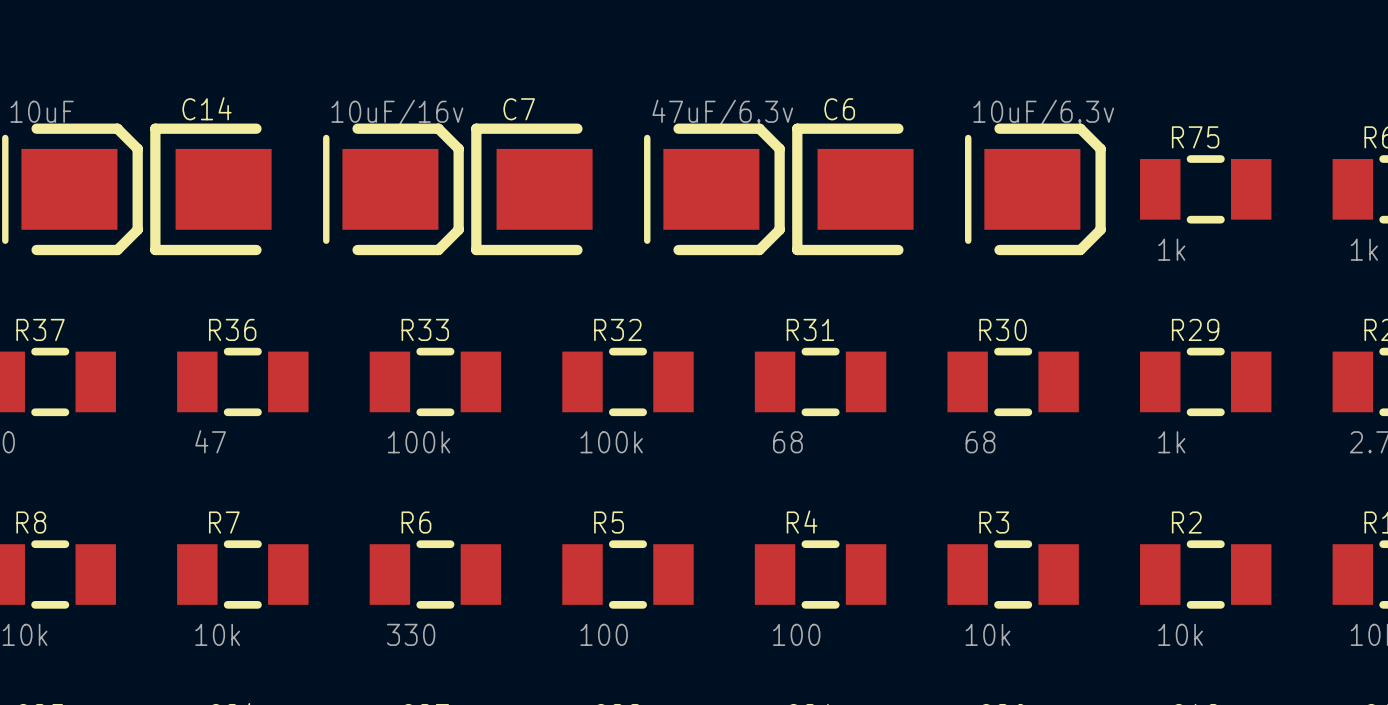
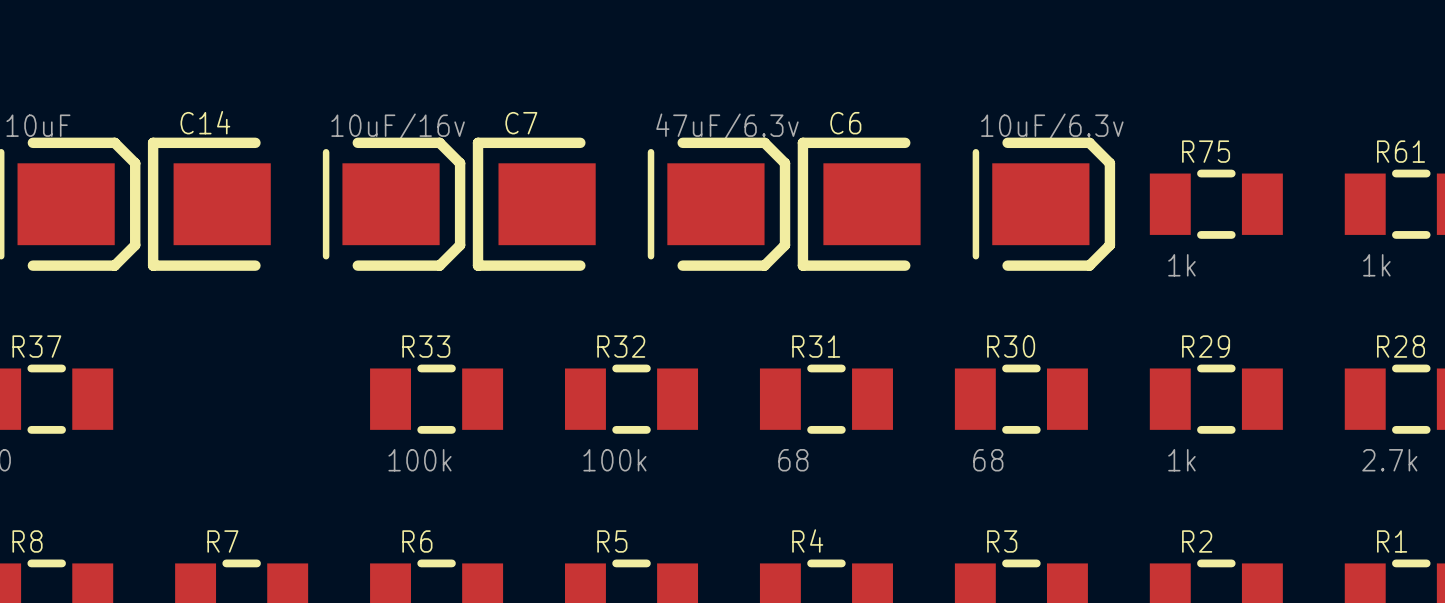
R36: 47 (242, 381) -> none

